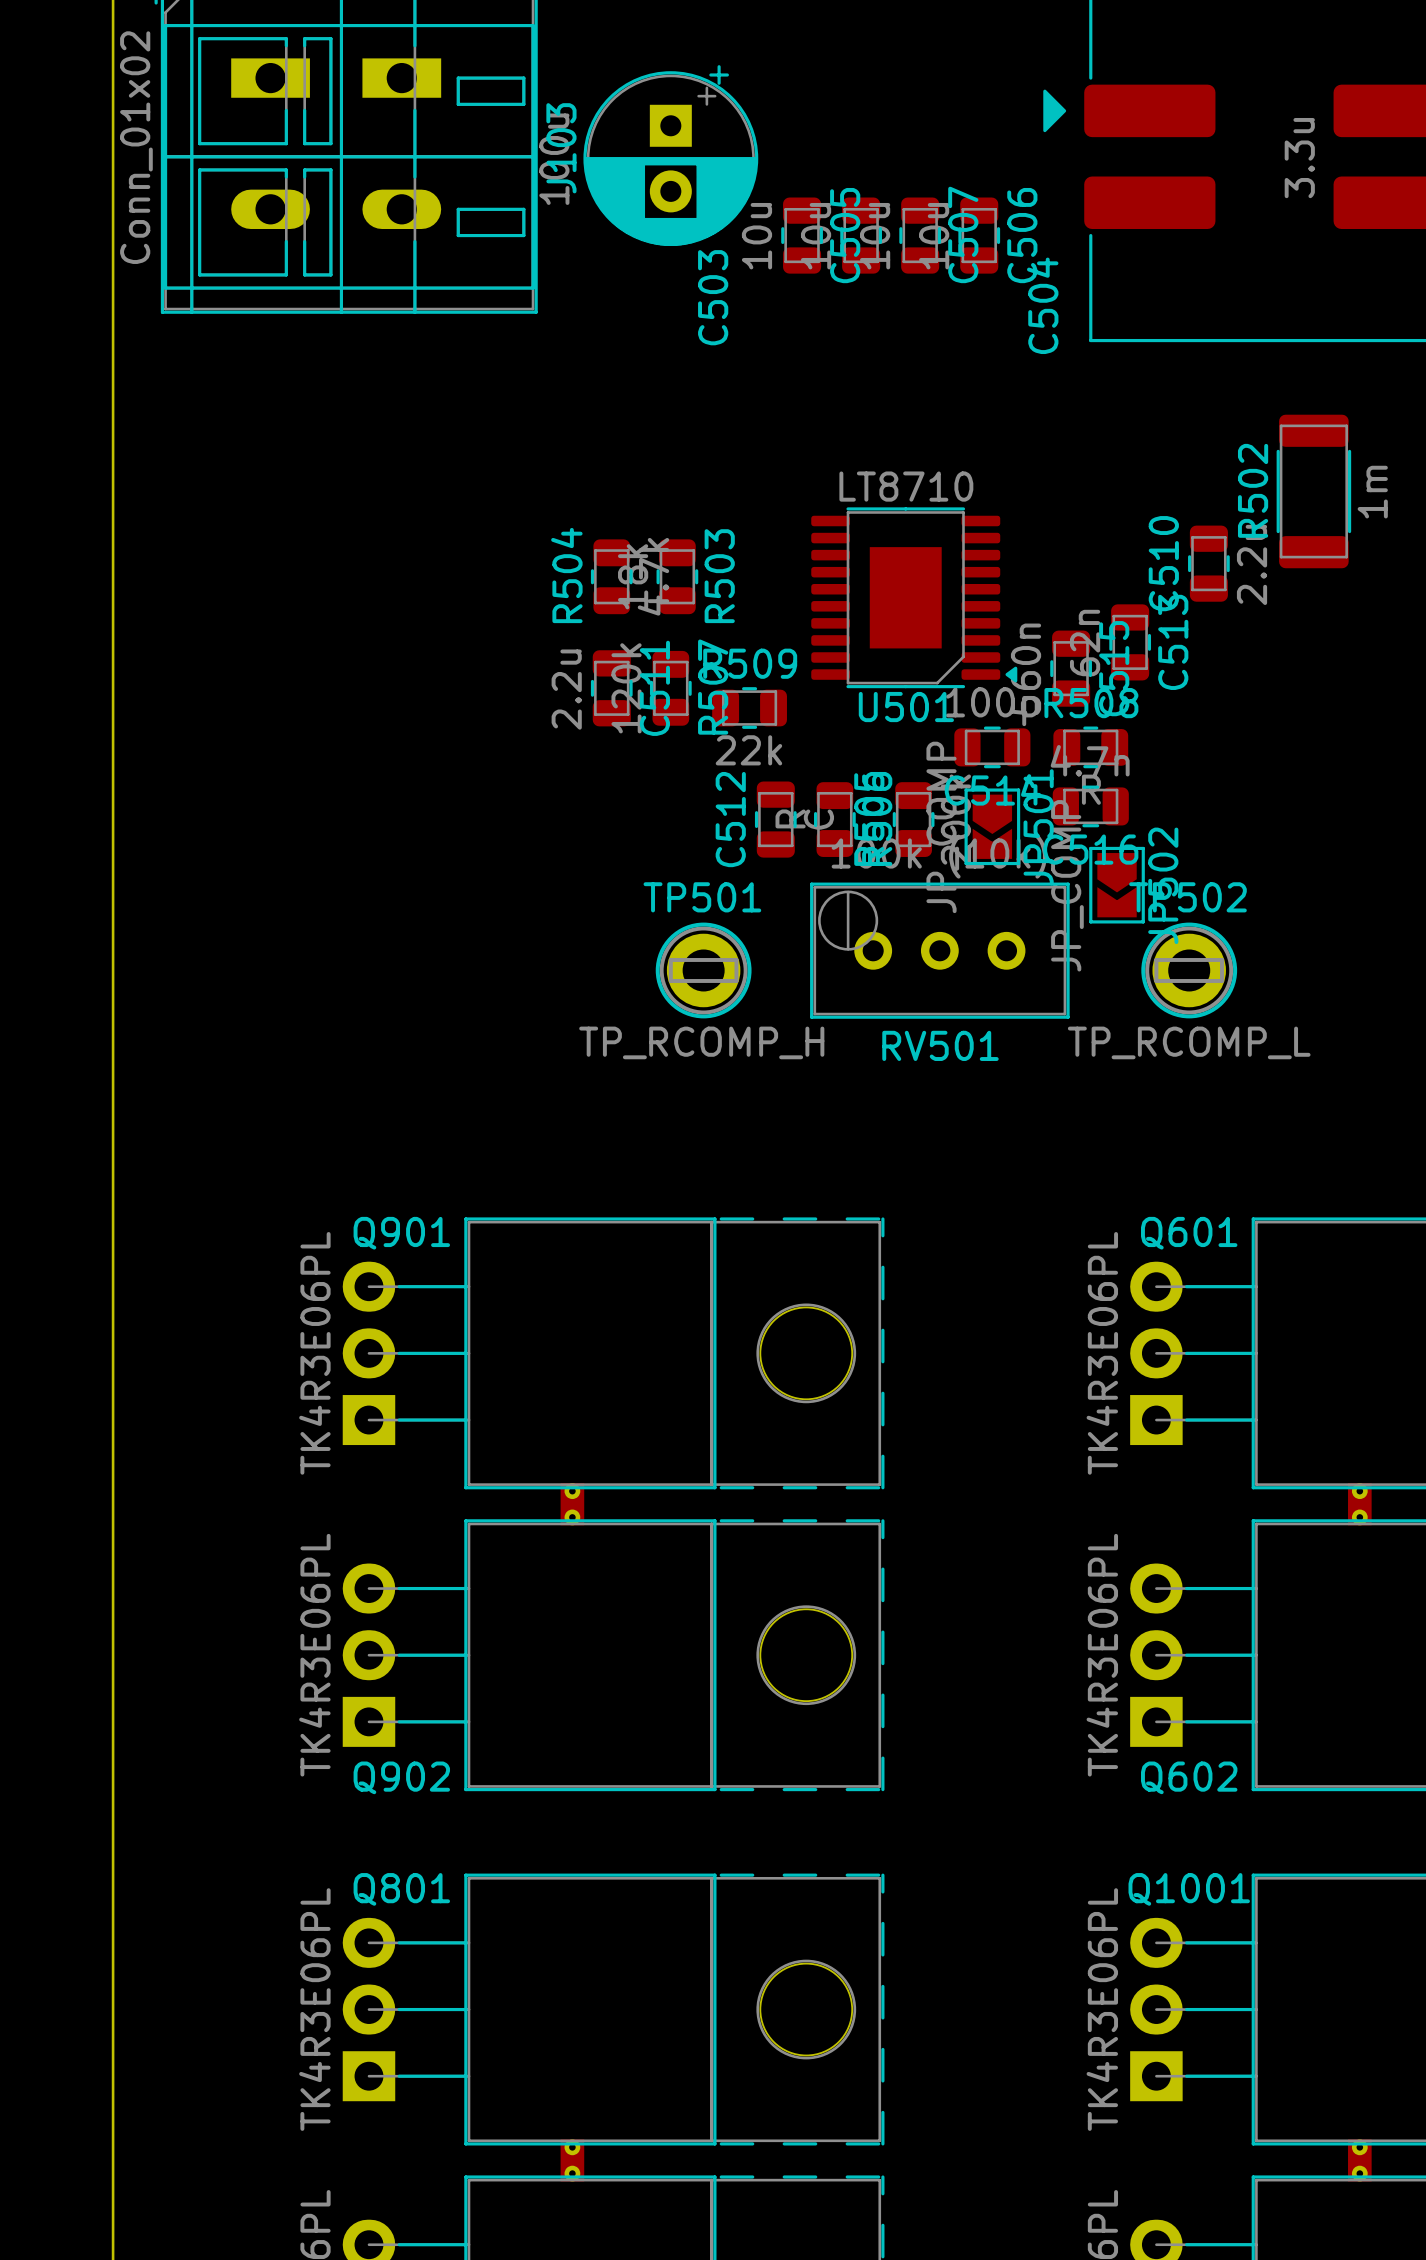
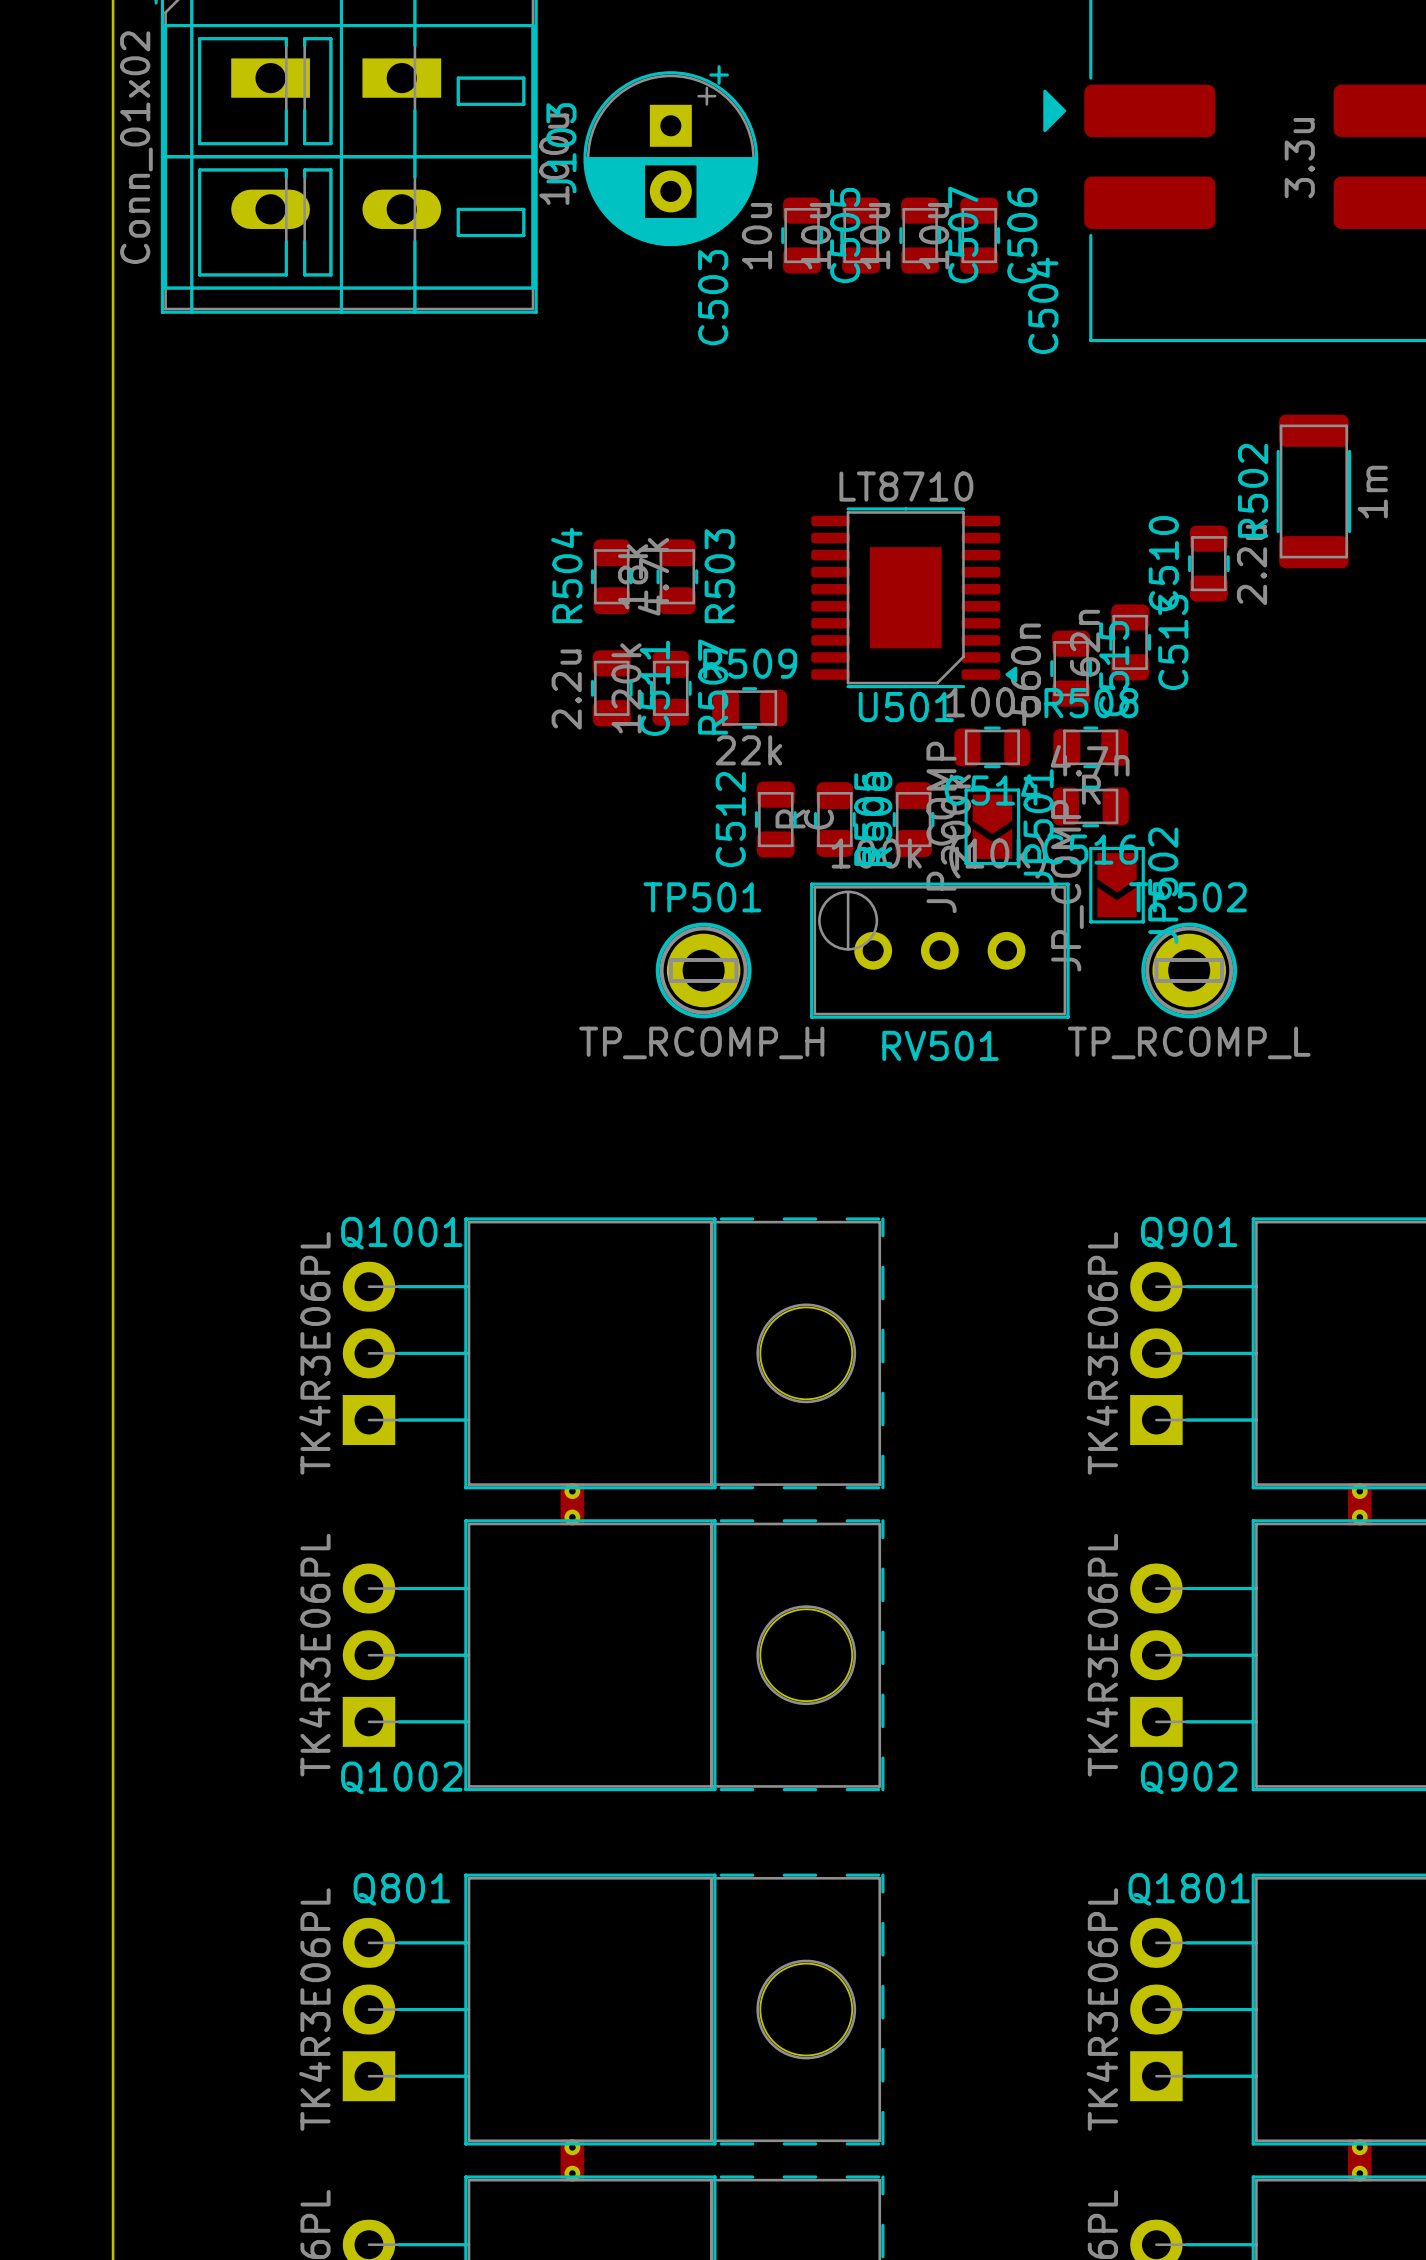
Q901 name: Q901 (401, 1233) -> Q1001 (401, 1233)
Q601 name: Q601 (1189, 1233) -> Q901 (1189, 1233)
Q902 name: Q902 (401, 1777) -> Q1002 (401, 1777)
Q602 name: Q602 (1189, 1777) -> Q902 (1189, 1777)
Q1001 name: Q1001 (1189, 1889) -> Q1801 (1189, 1889)

